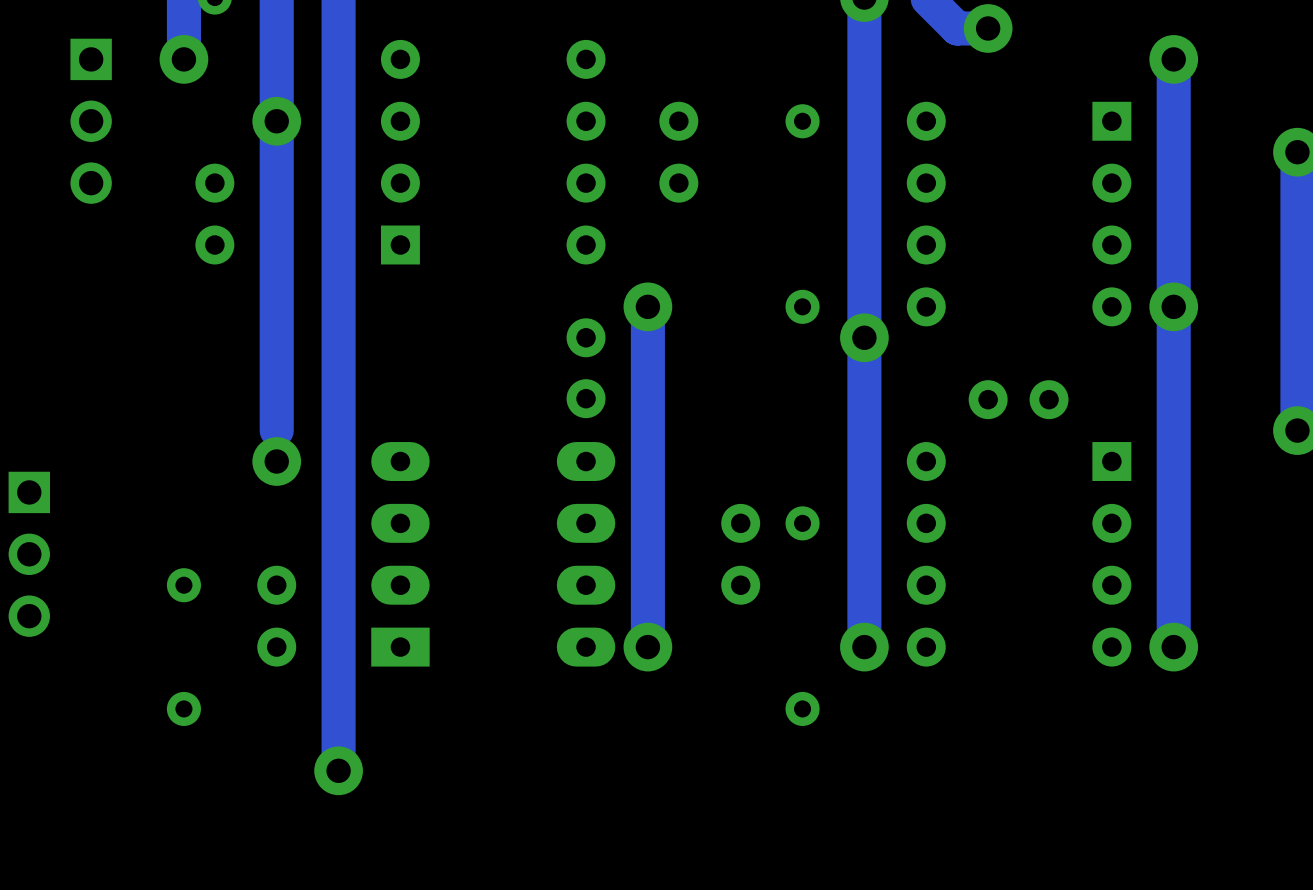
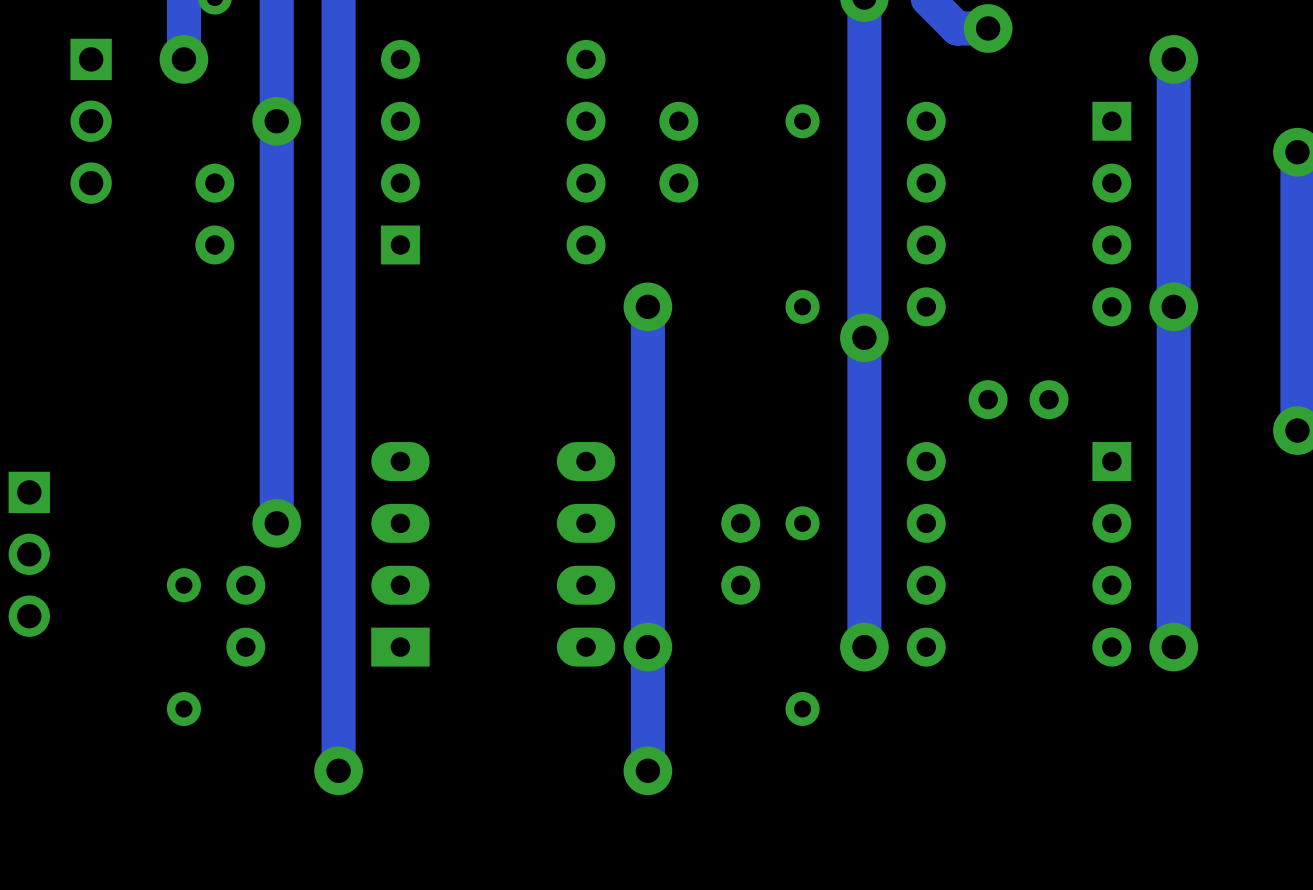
part: (586, 368) -> none
track: none -> (276, 430) (276, 523)
via position: (276, 461) -> (276, 523)
part position: (276, 616) -> (245, 616)
track: none -> (647, 647) (647, 770)
via: none -> (647, 770)

